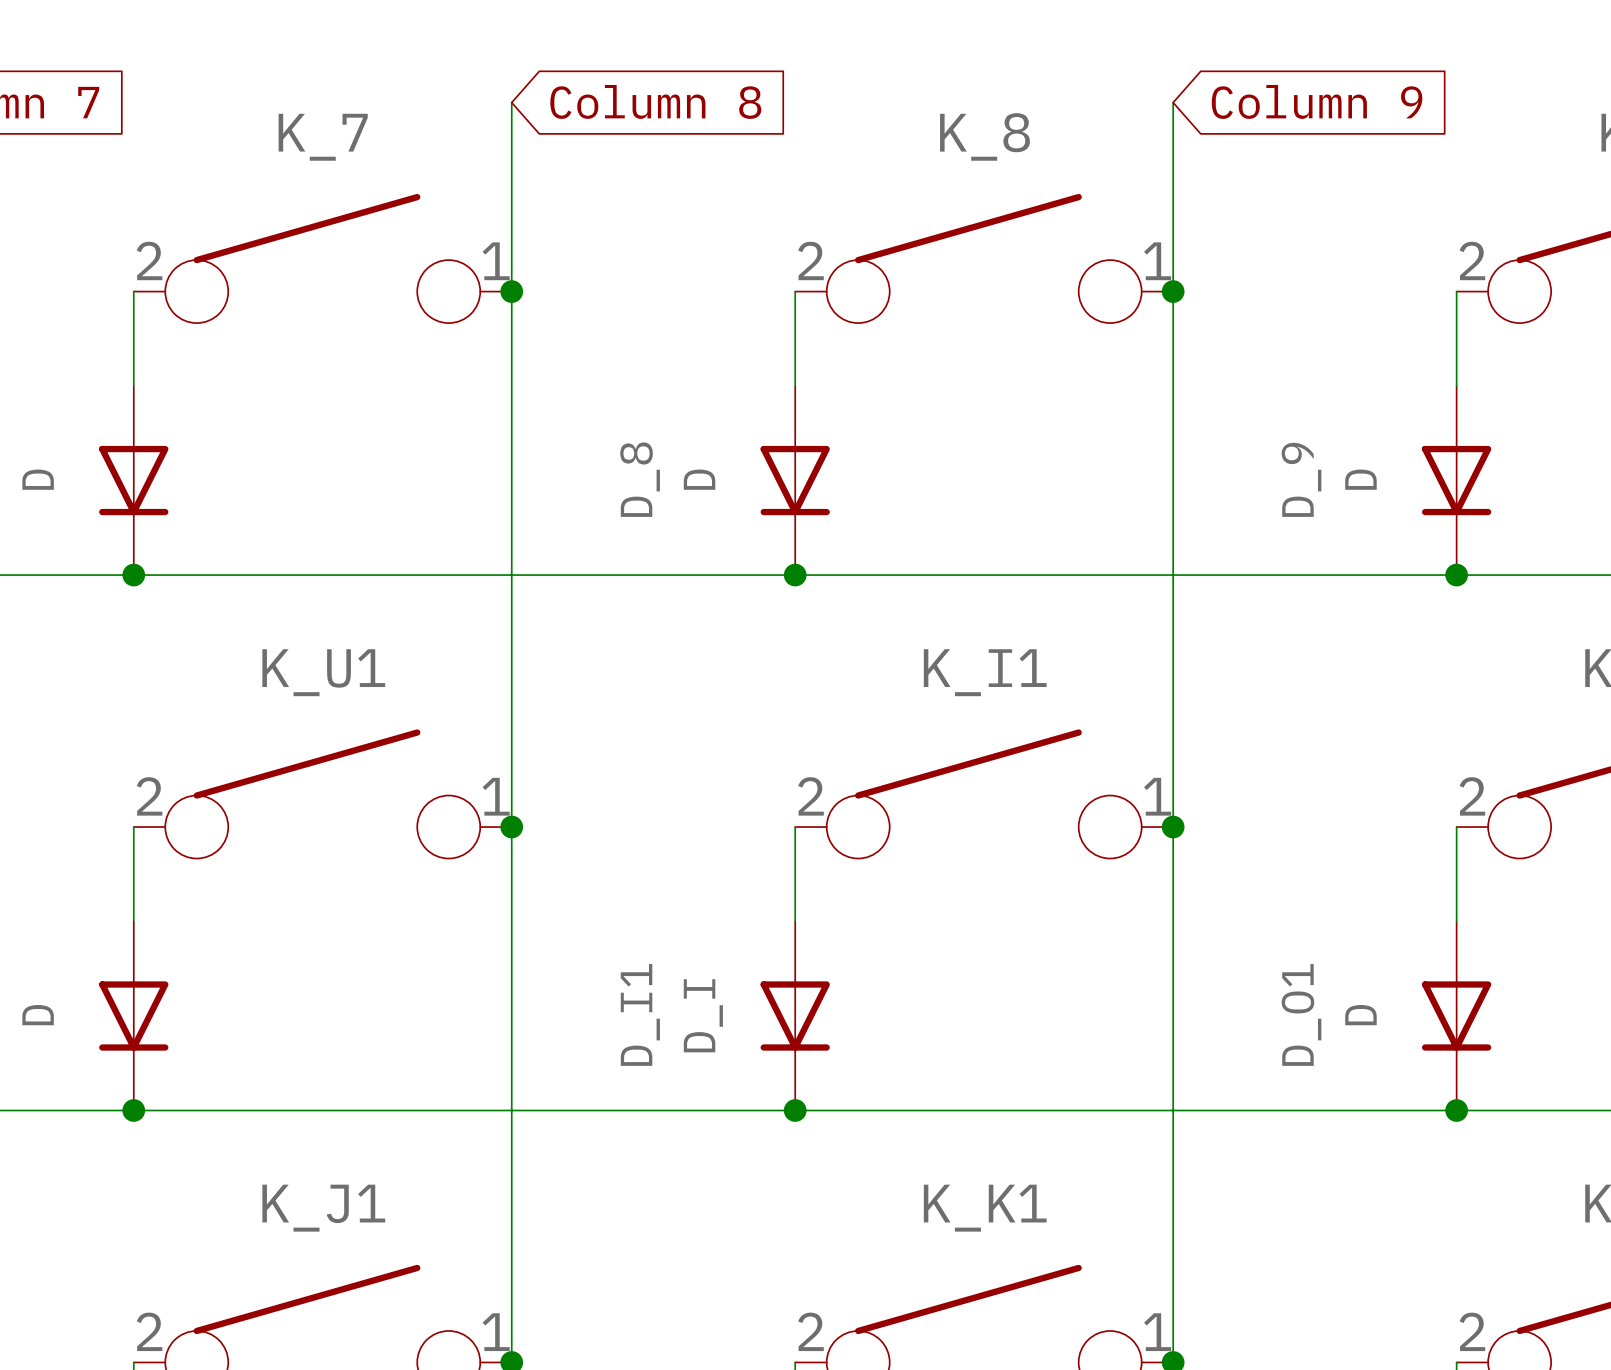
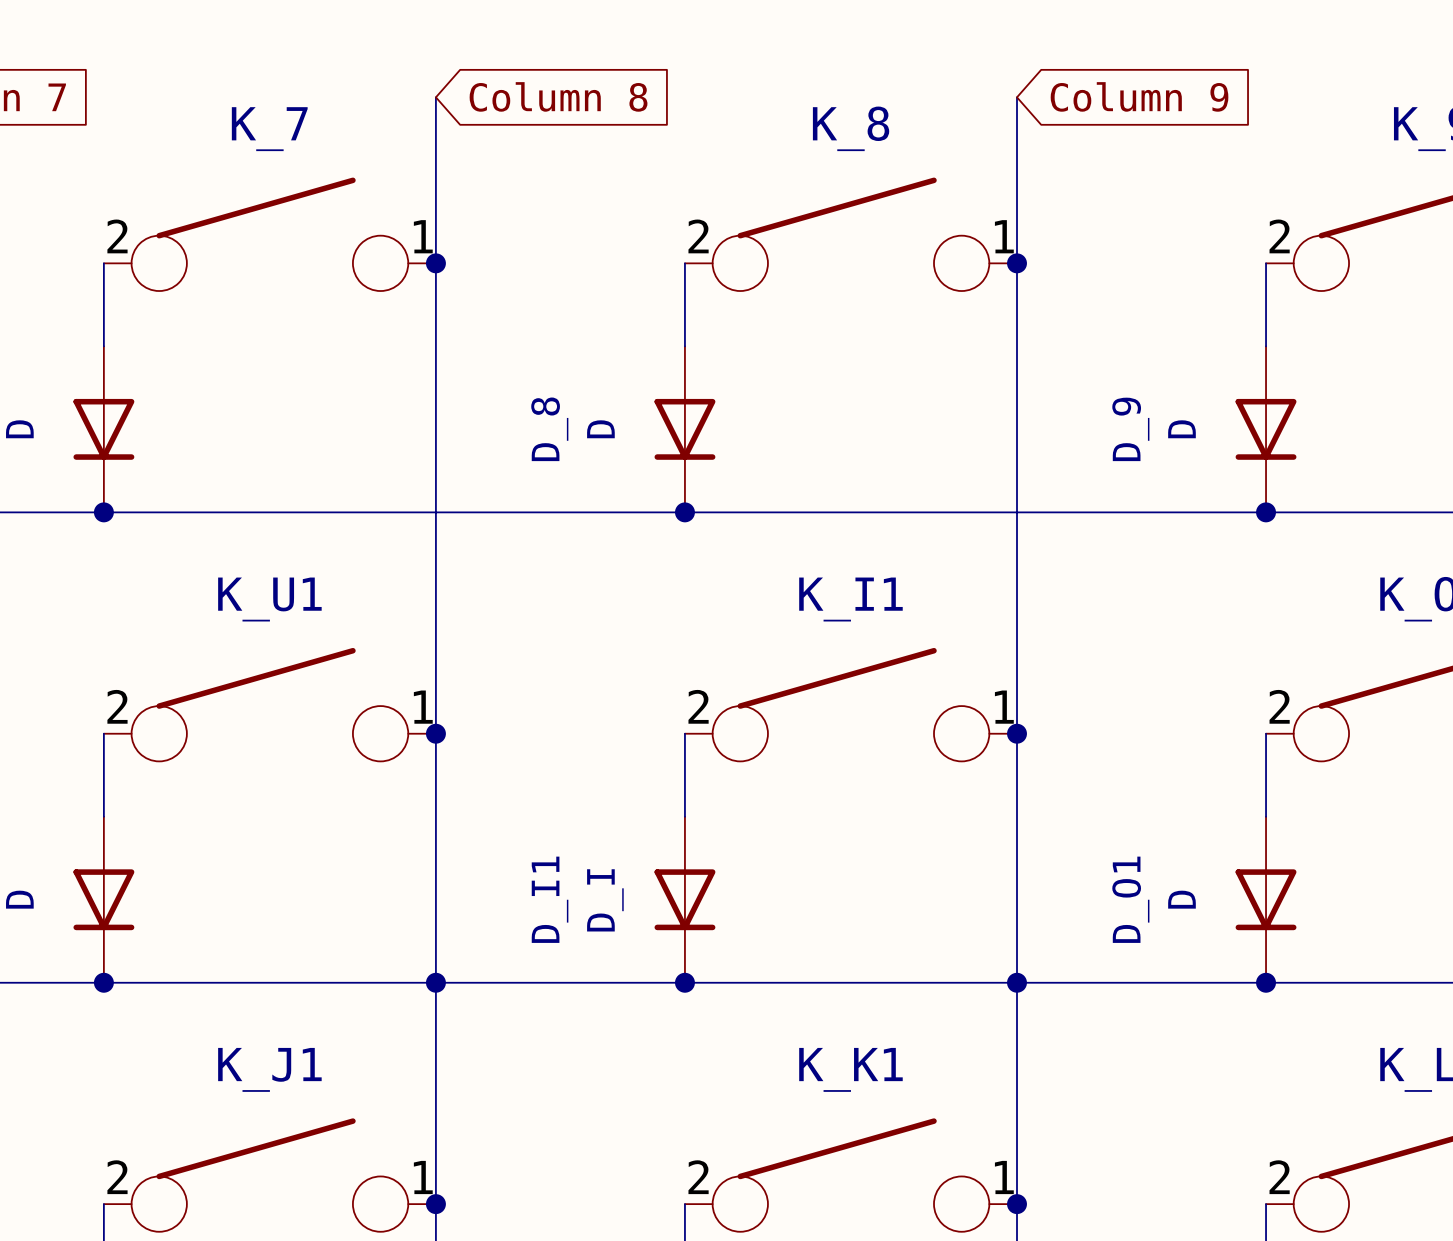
junction: none -> (435, 982)
junction: none -> (1017, 982)

